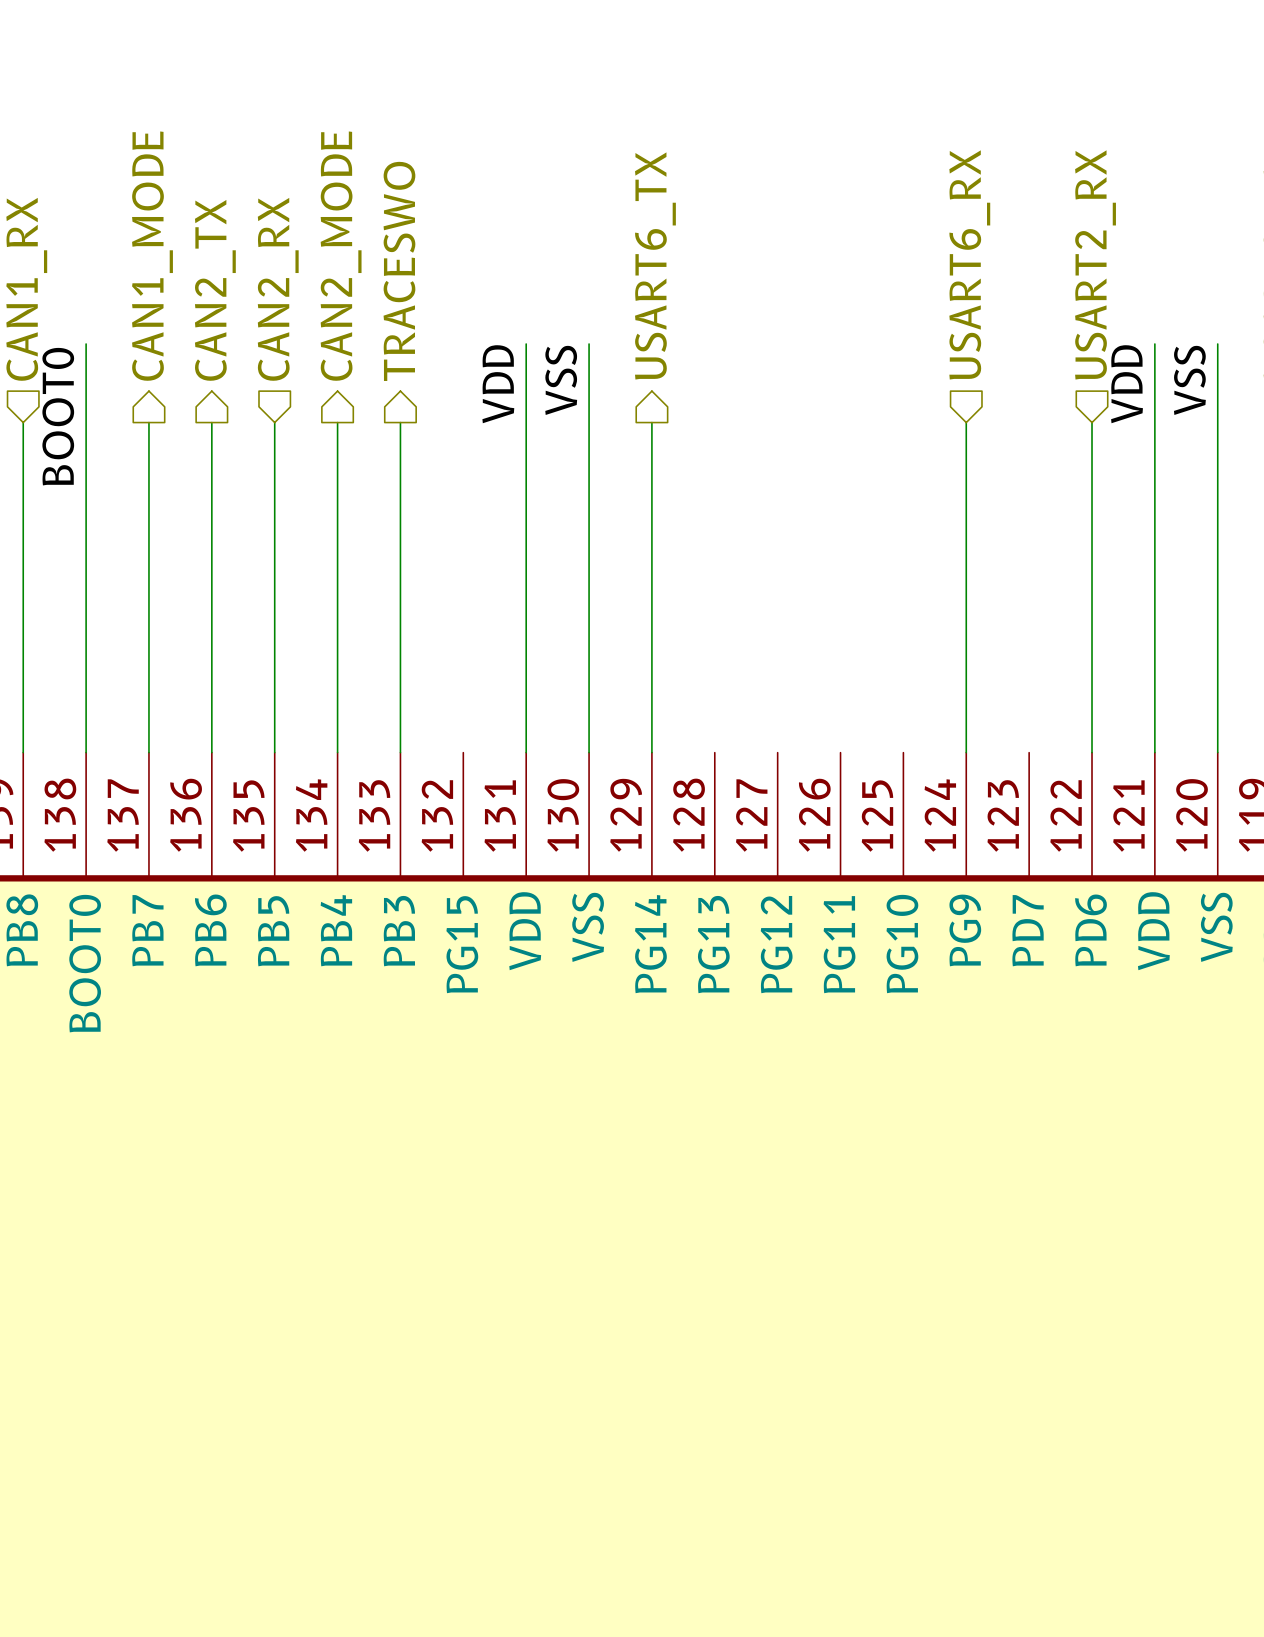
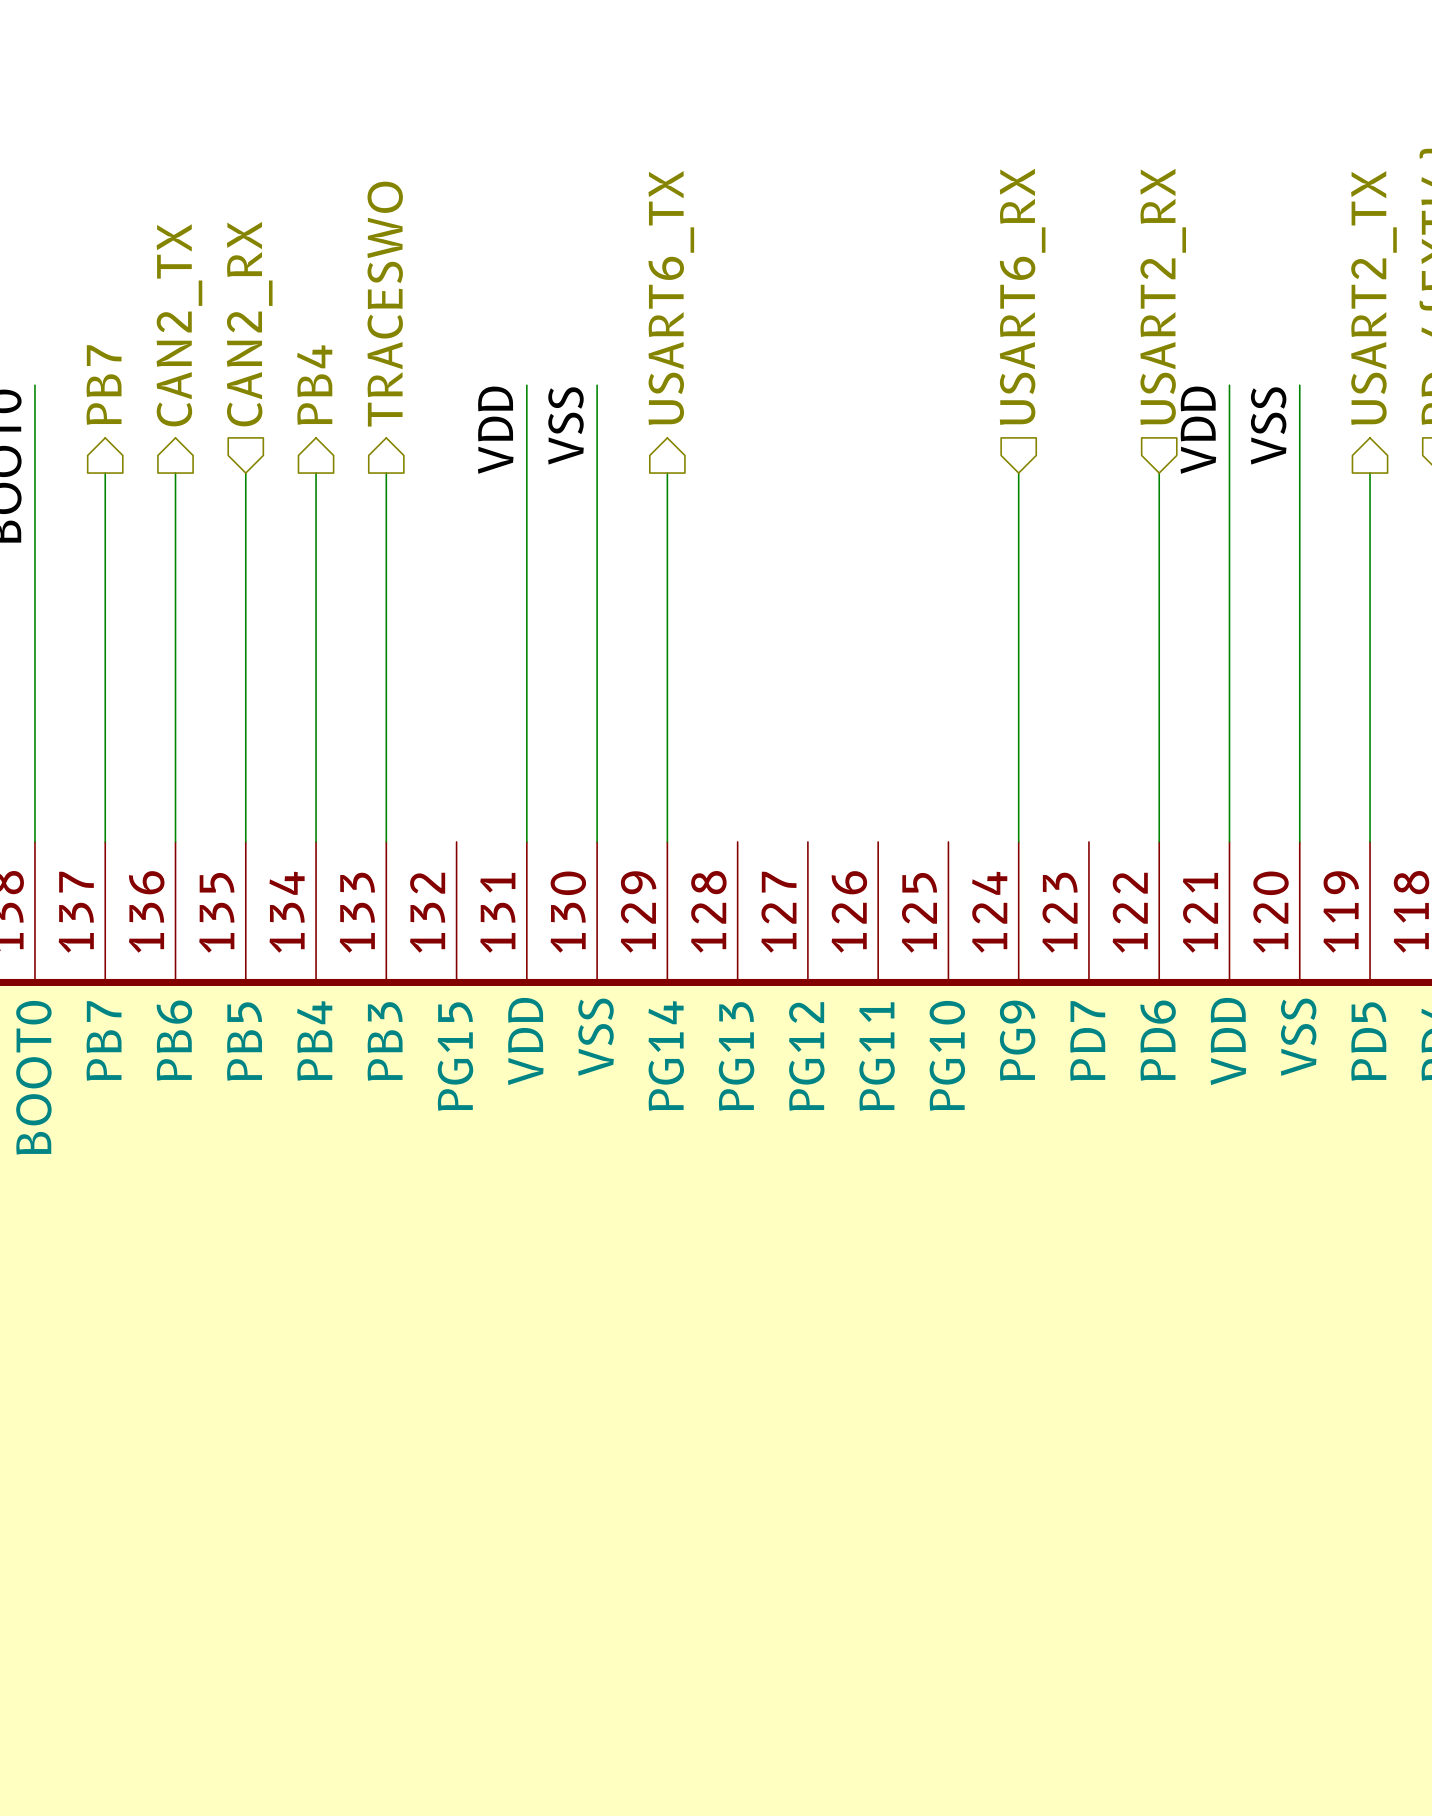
hierarchical label: CAN1_MODE (152, 256) -> PB7 (104, 385)
hierarchical label: CAN2_MODE (341, 256) -> PB4 (314, 385)

